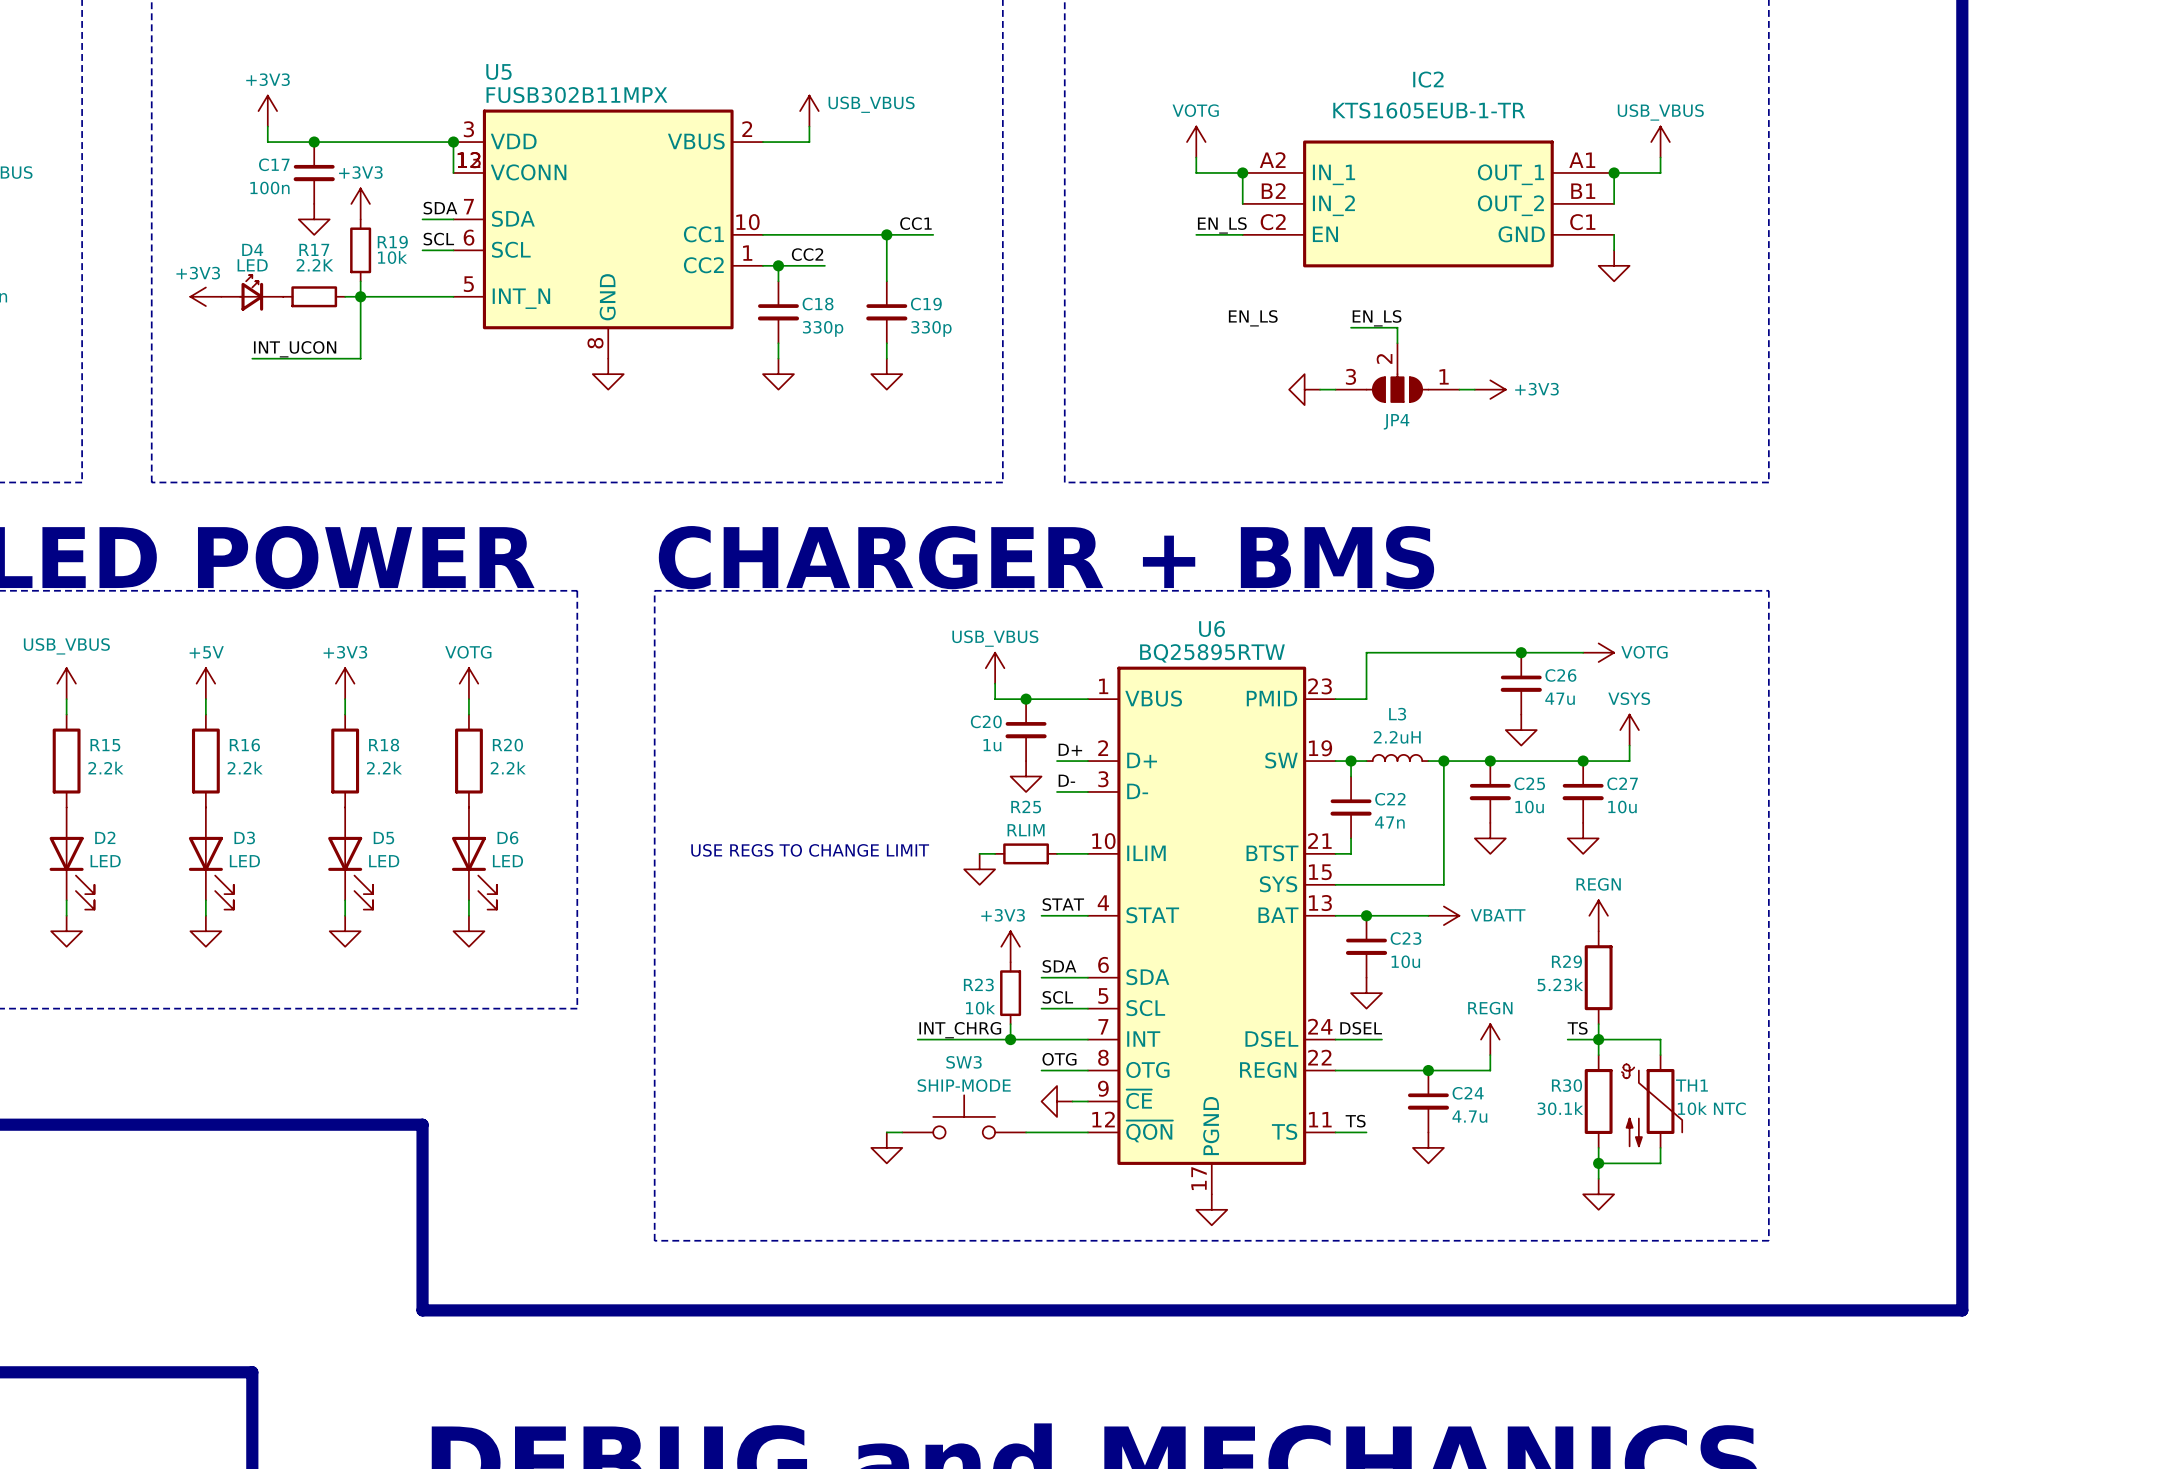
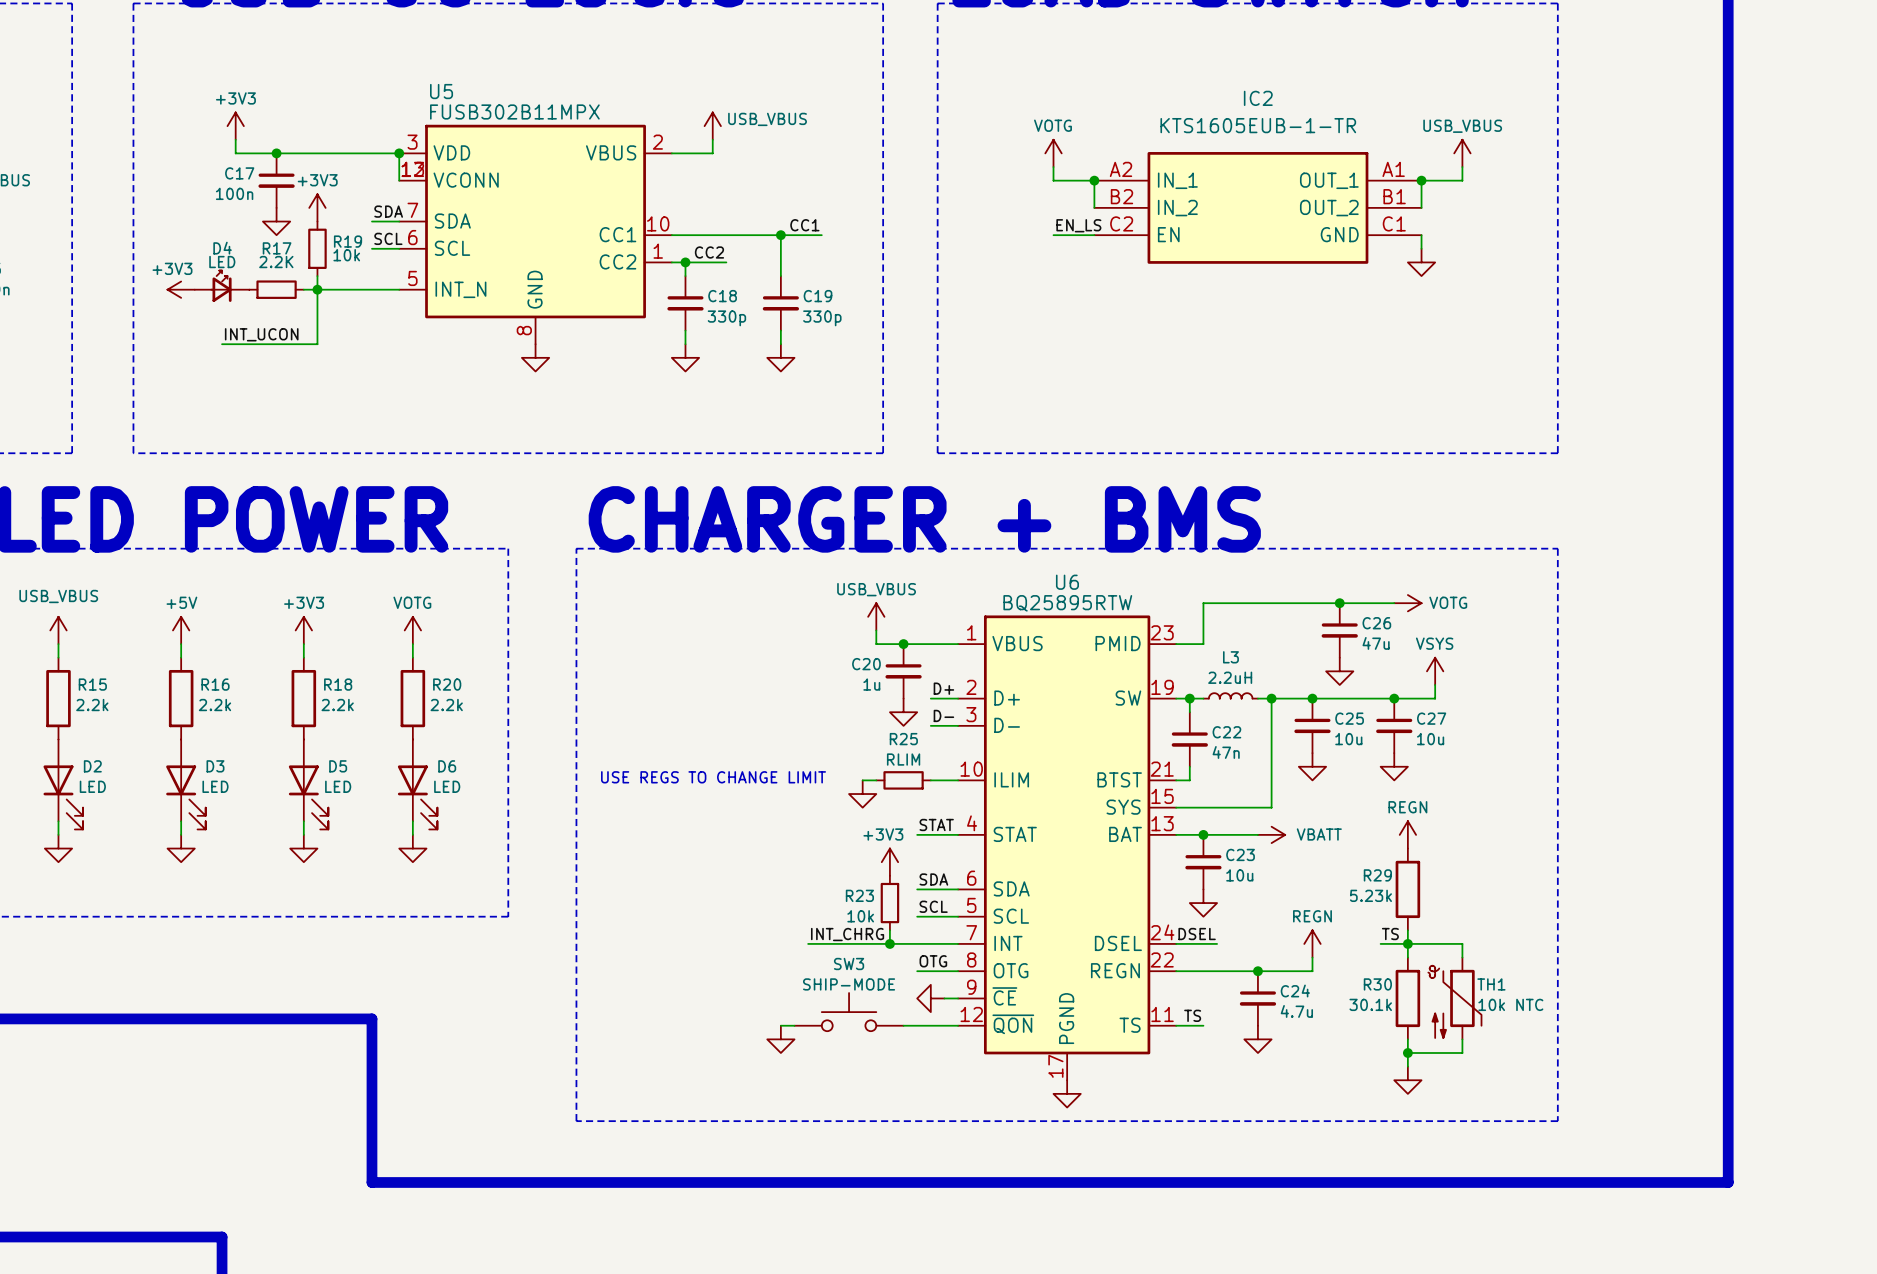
label: EN_LS (1253, 318) -> none
label: EN_LS (1377, 318) -> none
wire: (1351, 327) (1397, 327) (1397, 343) -> none
JP4: (1397, 372) -> none
power symbol: (1304, 389) -> none
wire: (1320, 389) (1335, 389) -> none
wire: (1459, 389) (1474, 389) -> none
power symbol: +3V3 (1490, 389) -> none

